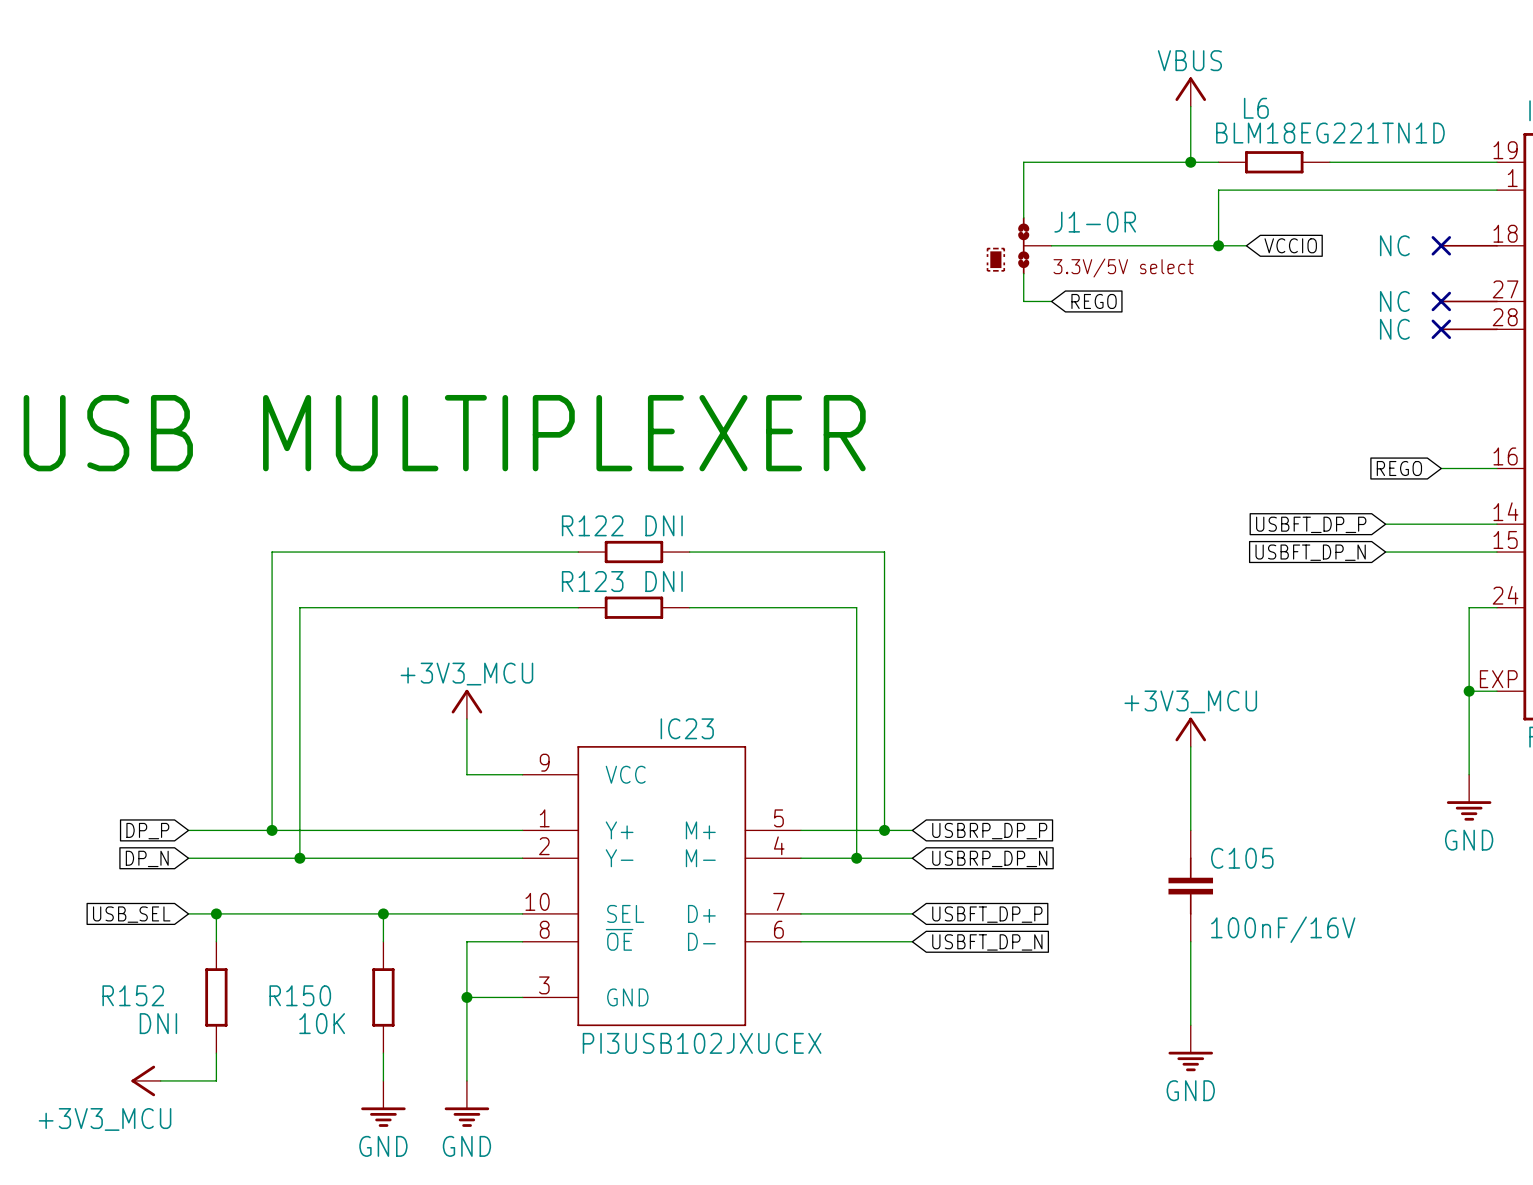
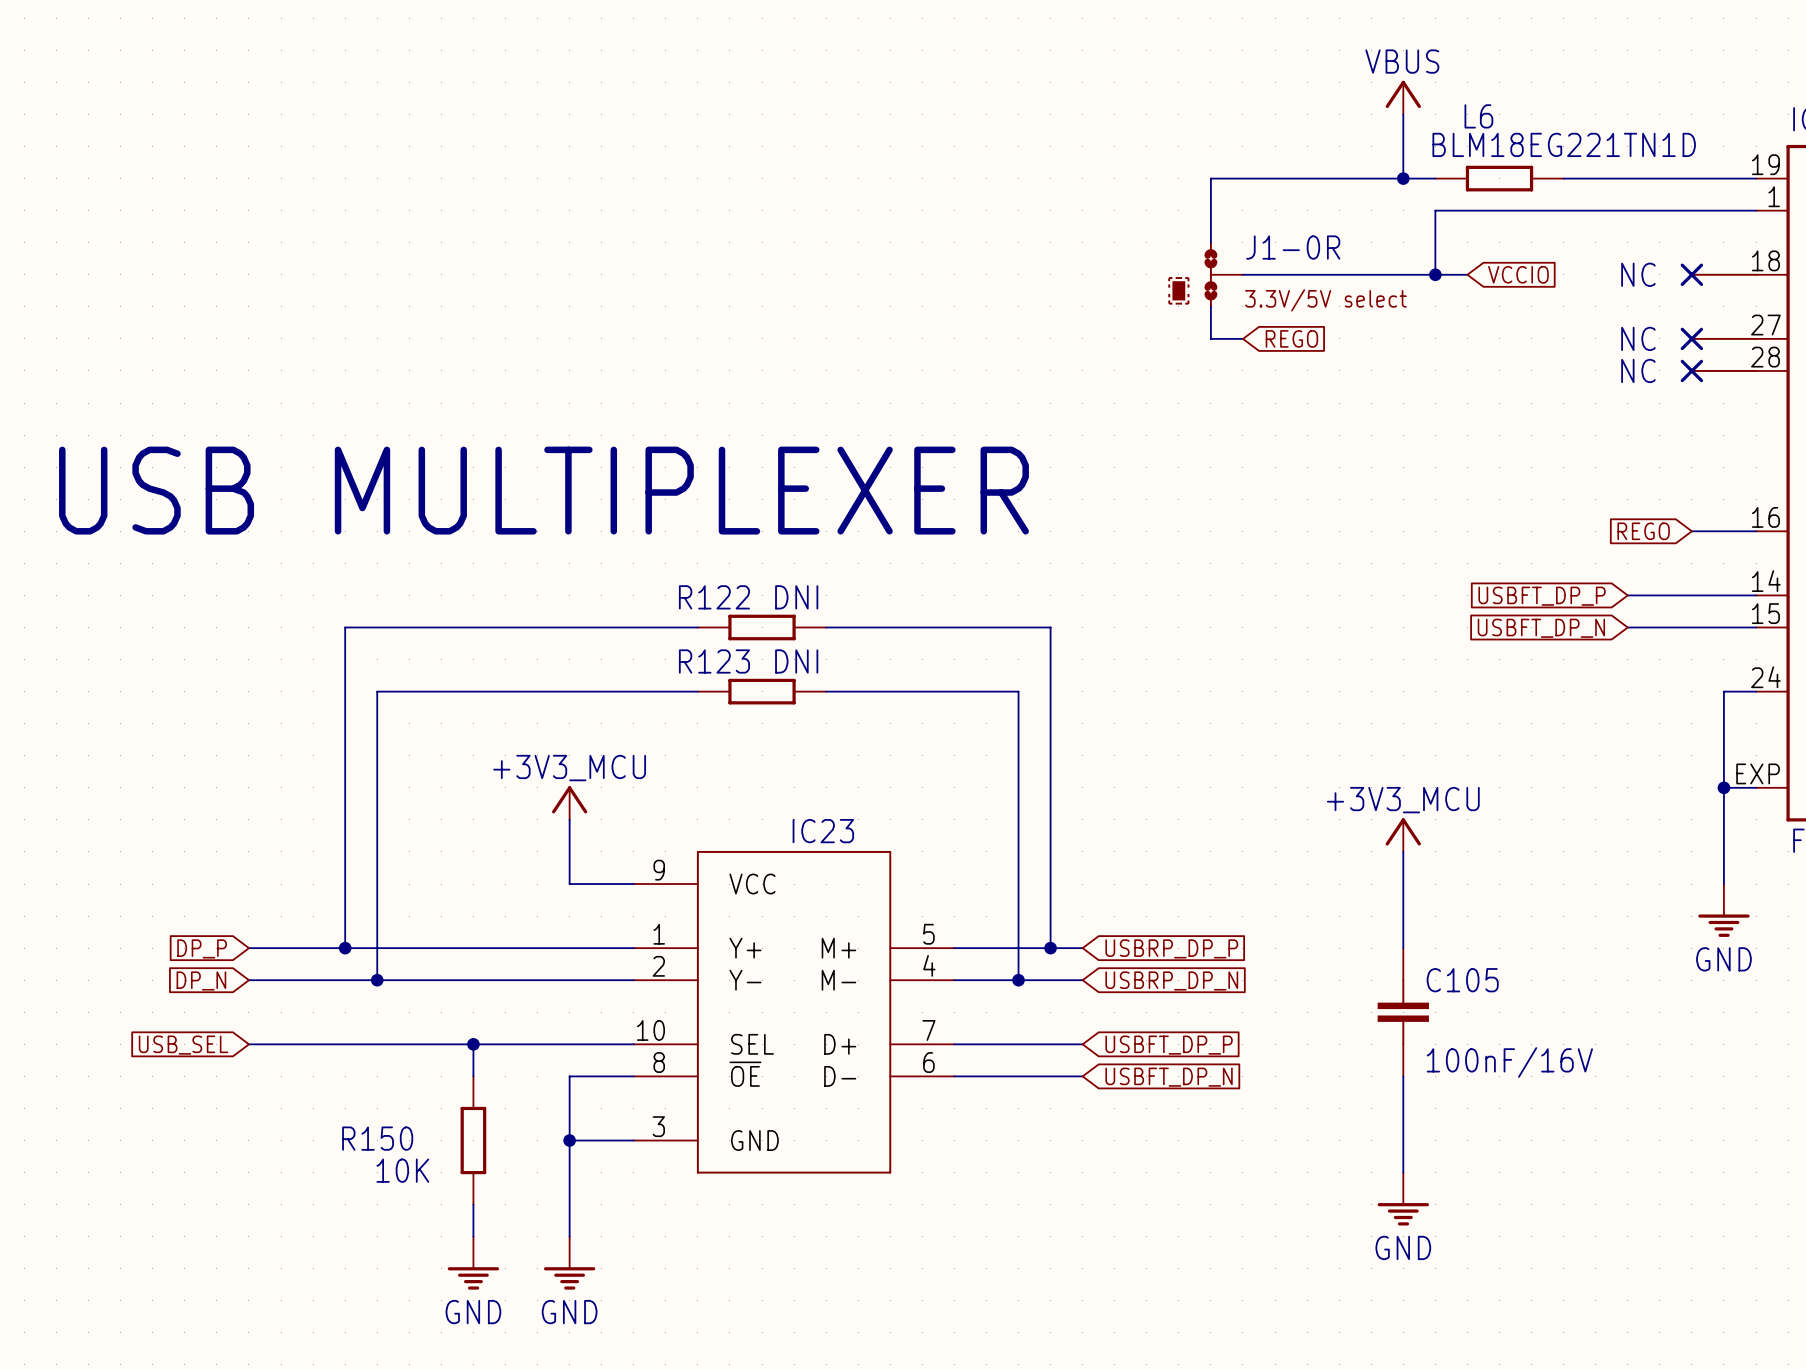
wire: (216, 913) (216, 941) -> none
junction: (216, 913) -> none
R152: DNI (216, 997) -> none
IC23 value: PI3USB102JXUCEX (702, 1043) -> none
wire: (216, 1053) (216, 1080) (160, 1080) -> none
power symbol: +3V3_MCU (146, 1080) -> none

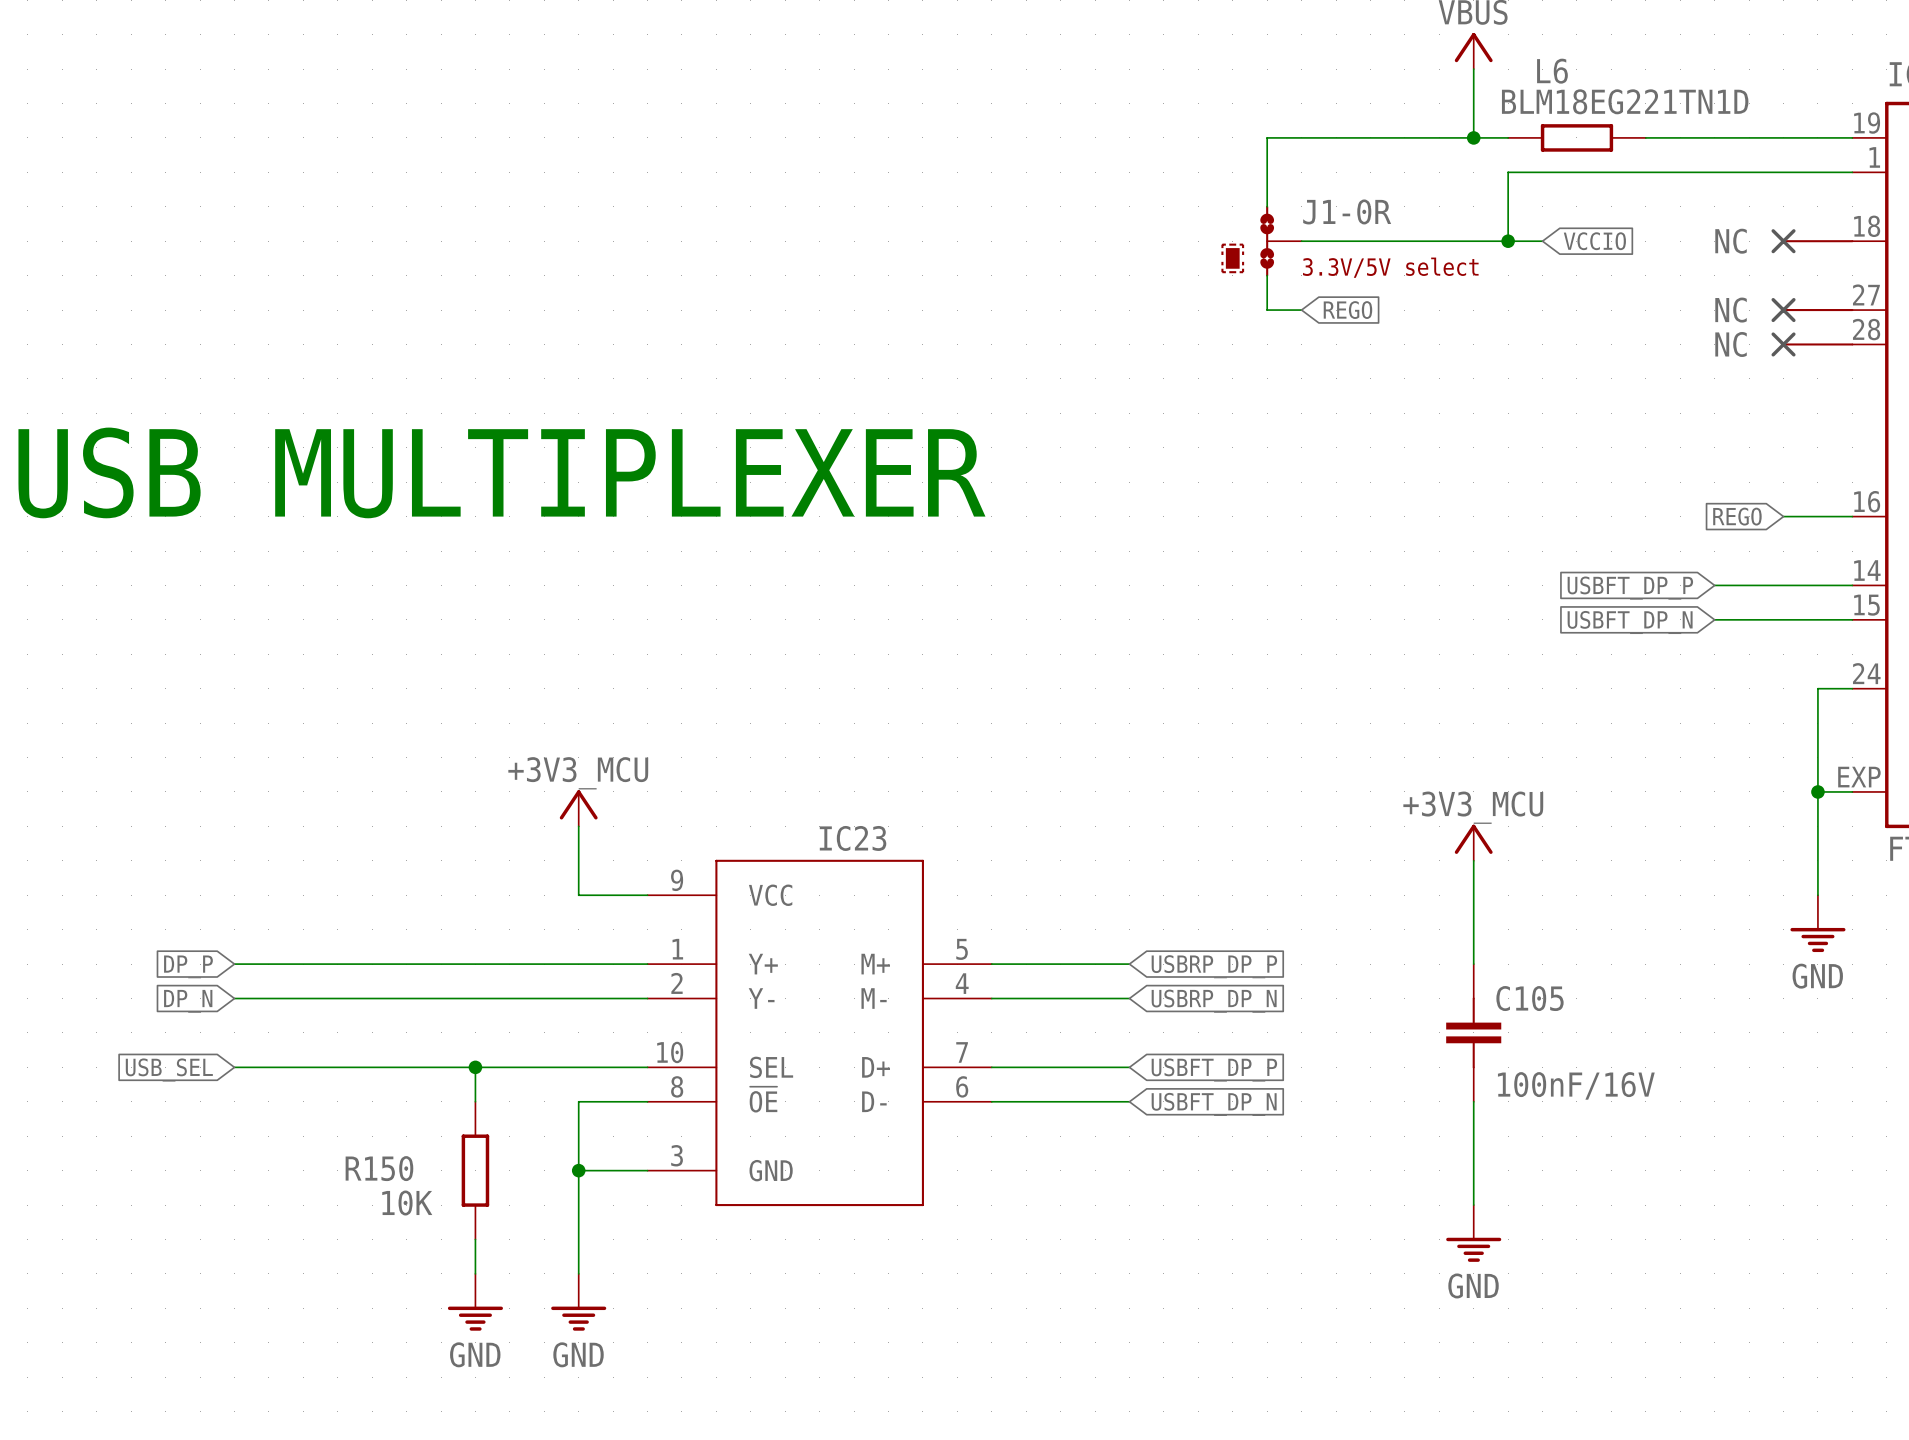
wire: (697, 627) (345, 627) (345, 948) -> none
R122: DNI (762, 627) -> none
wire: (826, 627) (1050, 627) (1050, 948) -> none
wire: (697, 691) (377, 691) (377, 980) -> none
R123: DNI (762, 691) -> none
wire: (826, 691) (1018, 691) (1018, 980) -> none
junction: (345, 948) -> none
junction: (1050, 948) -> none
junction: (377, 980) -> none
junction: (1018, 980) -> none

